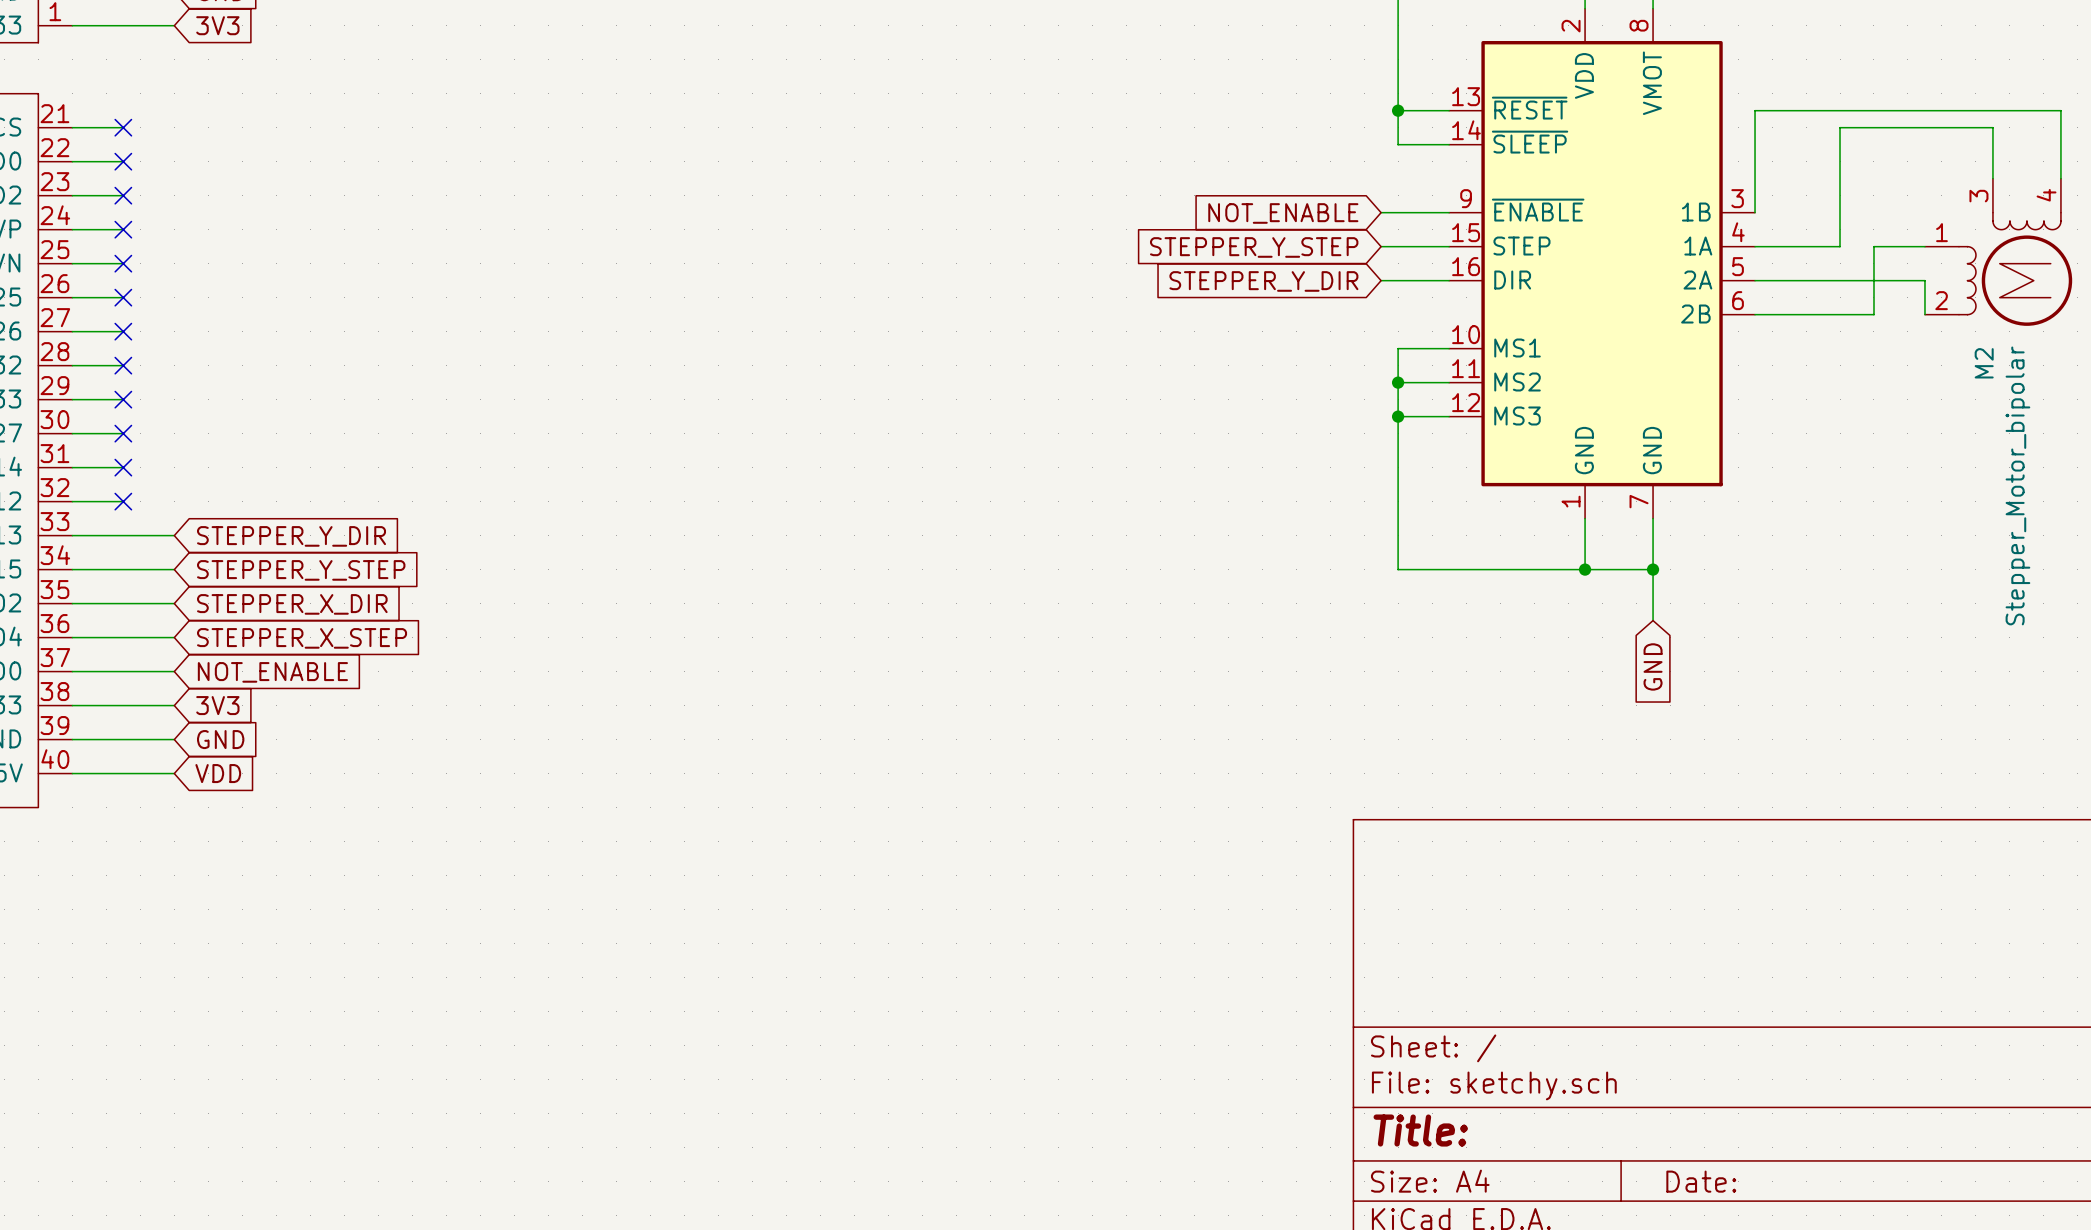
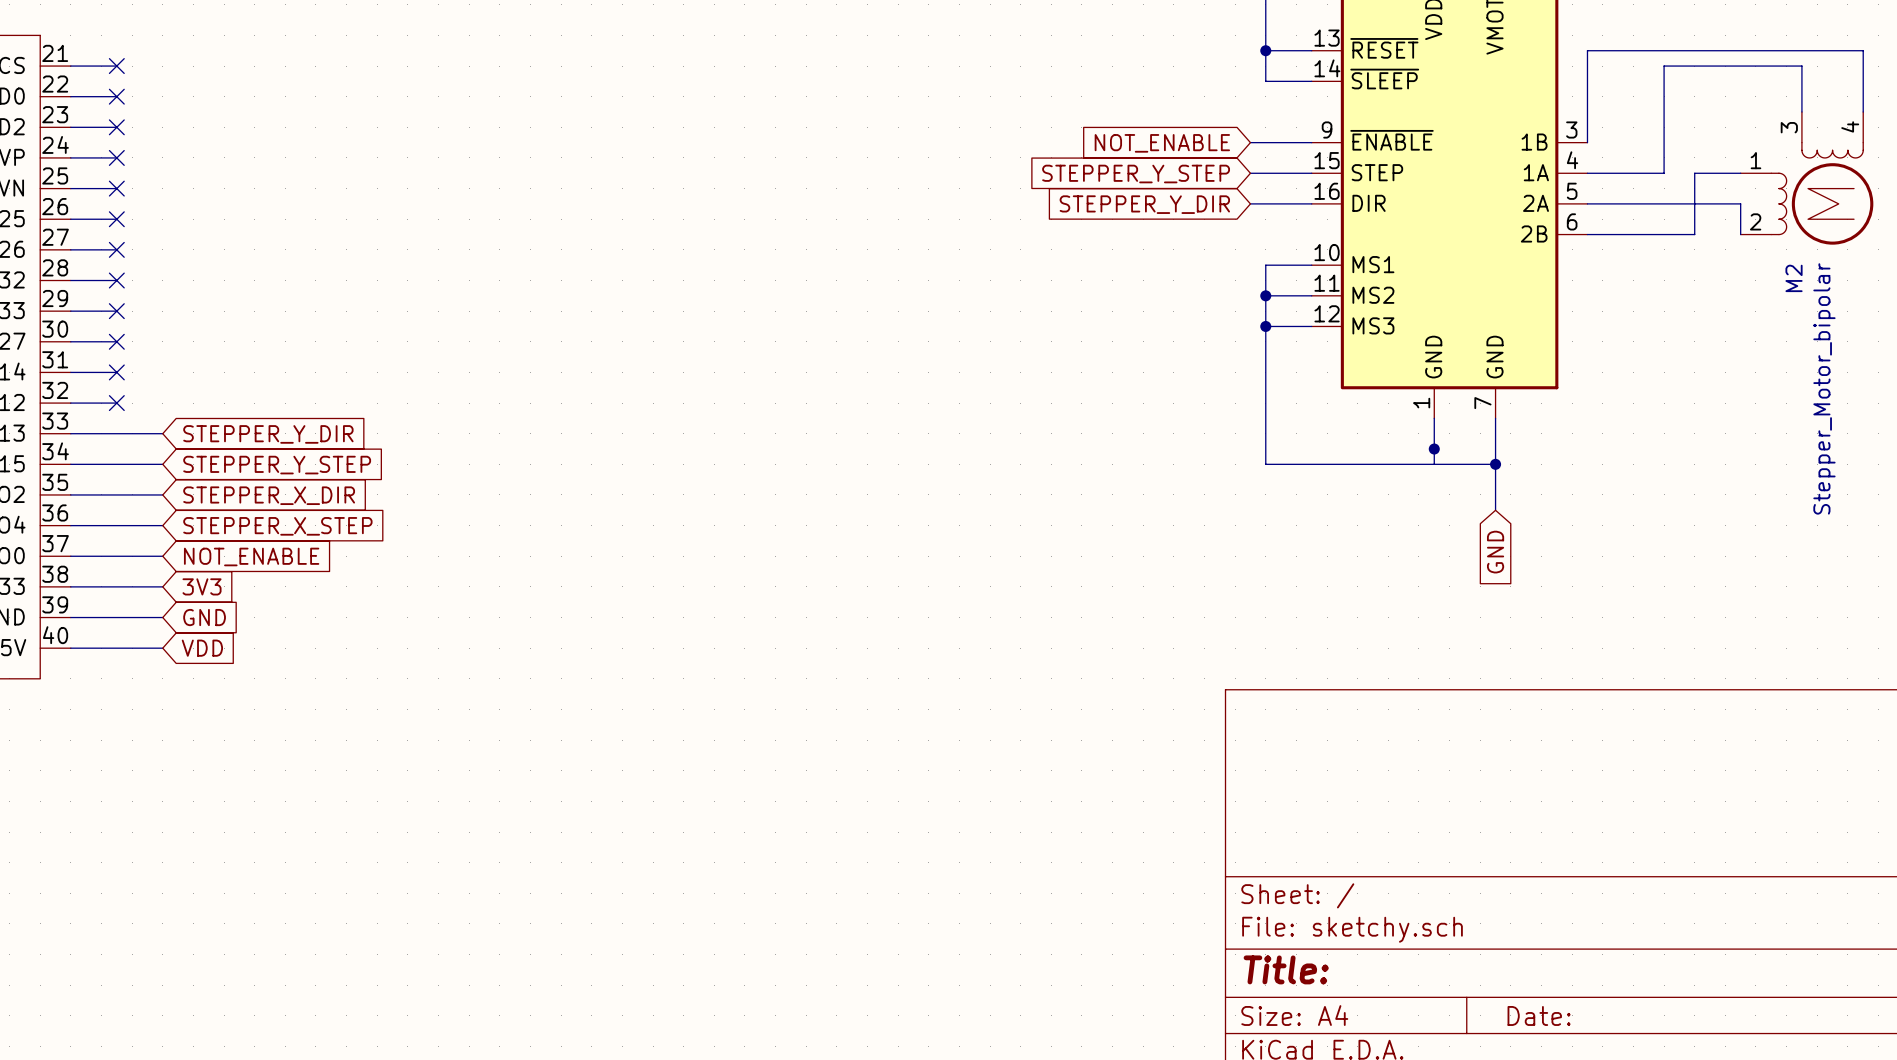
junction position: (1585, 569) -> (1434, 449)

